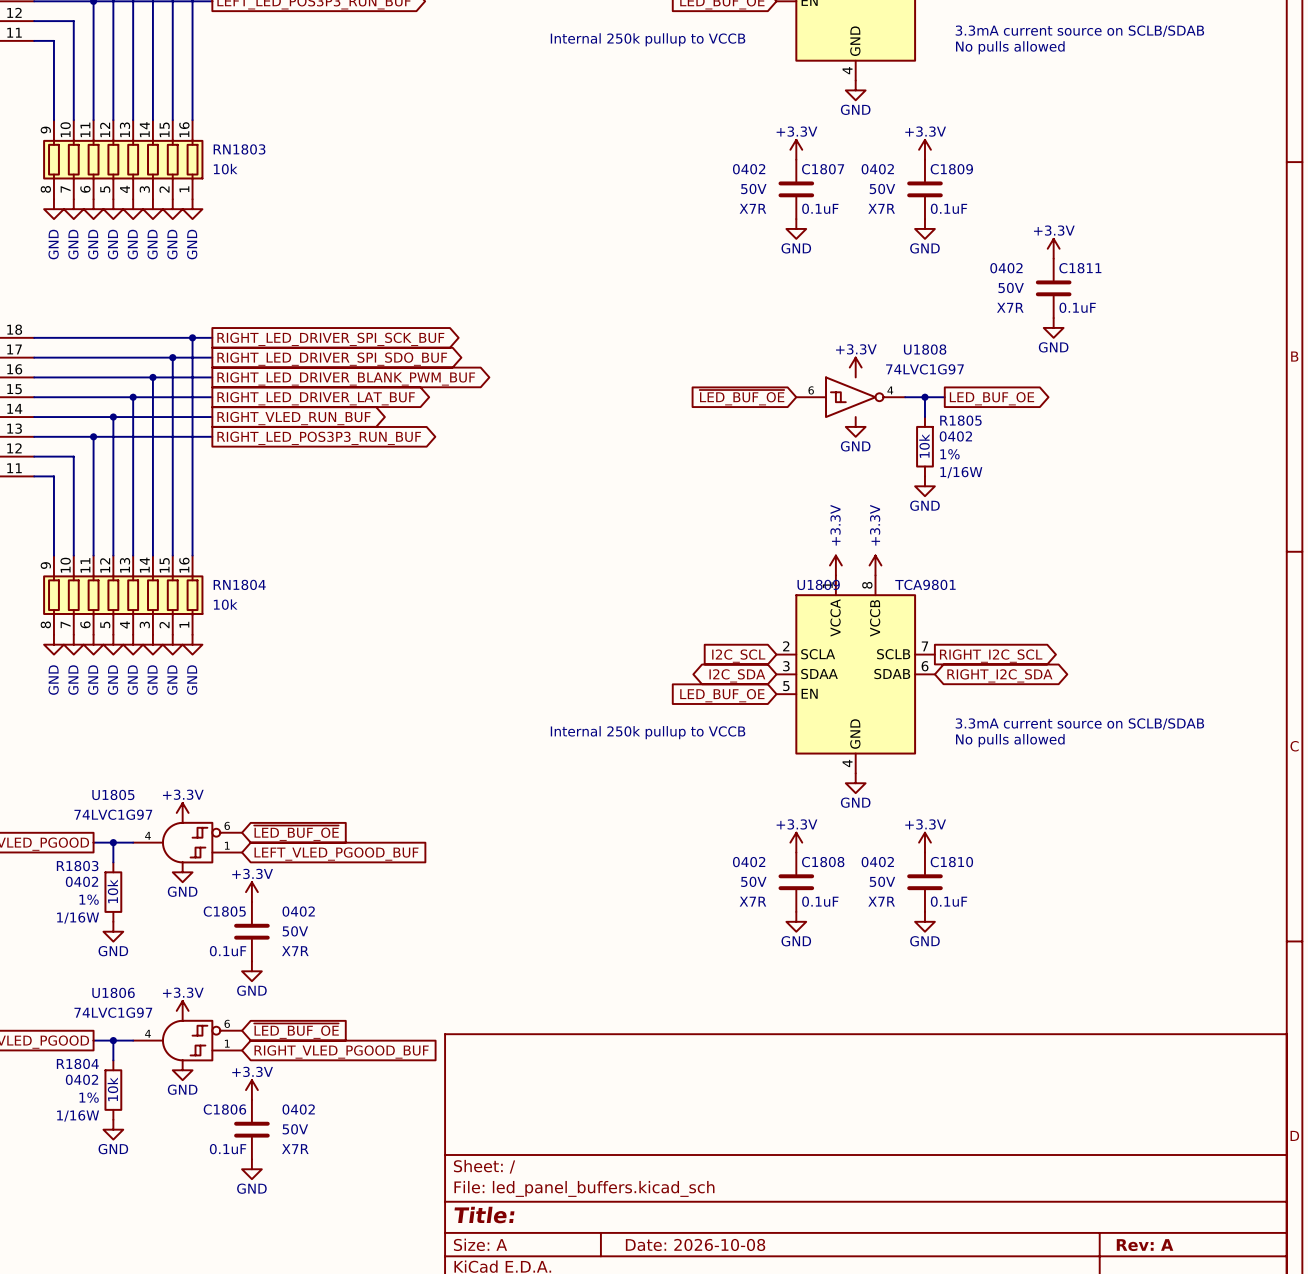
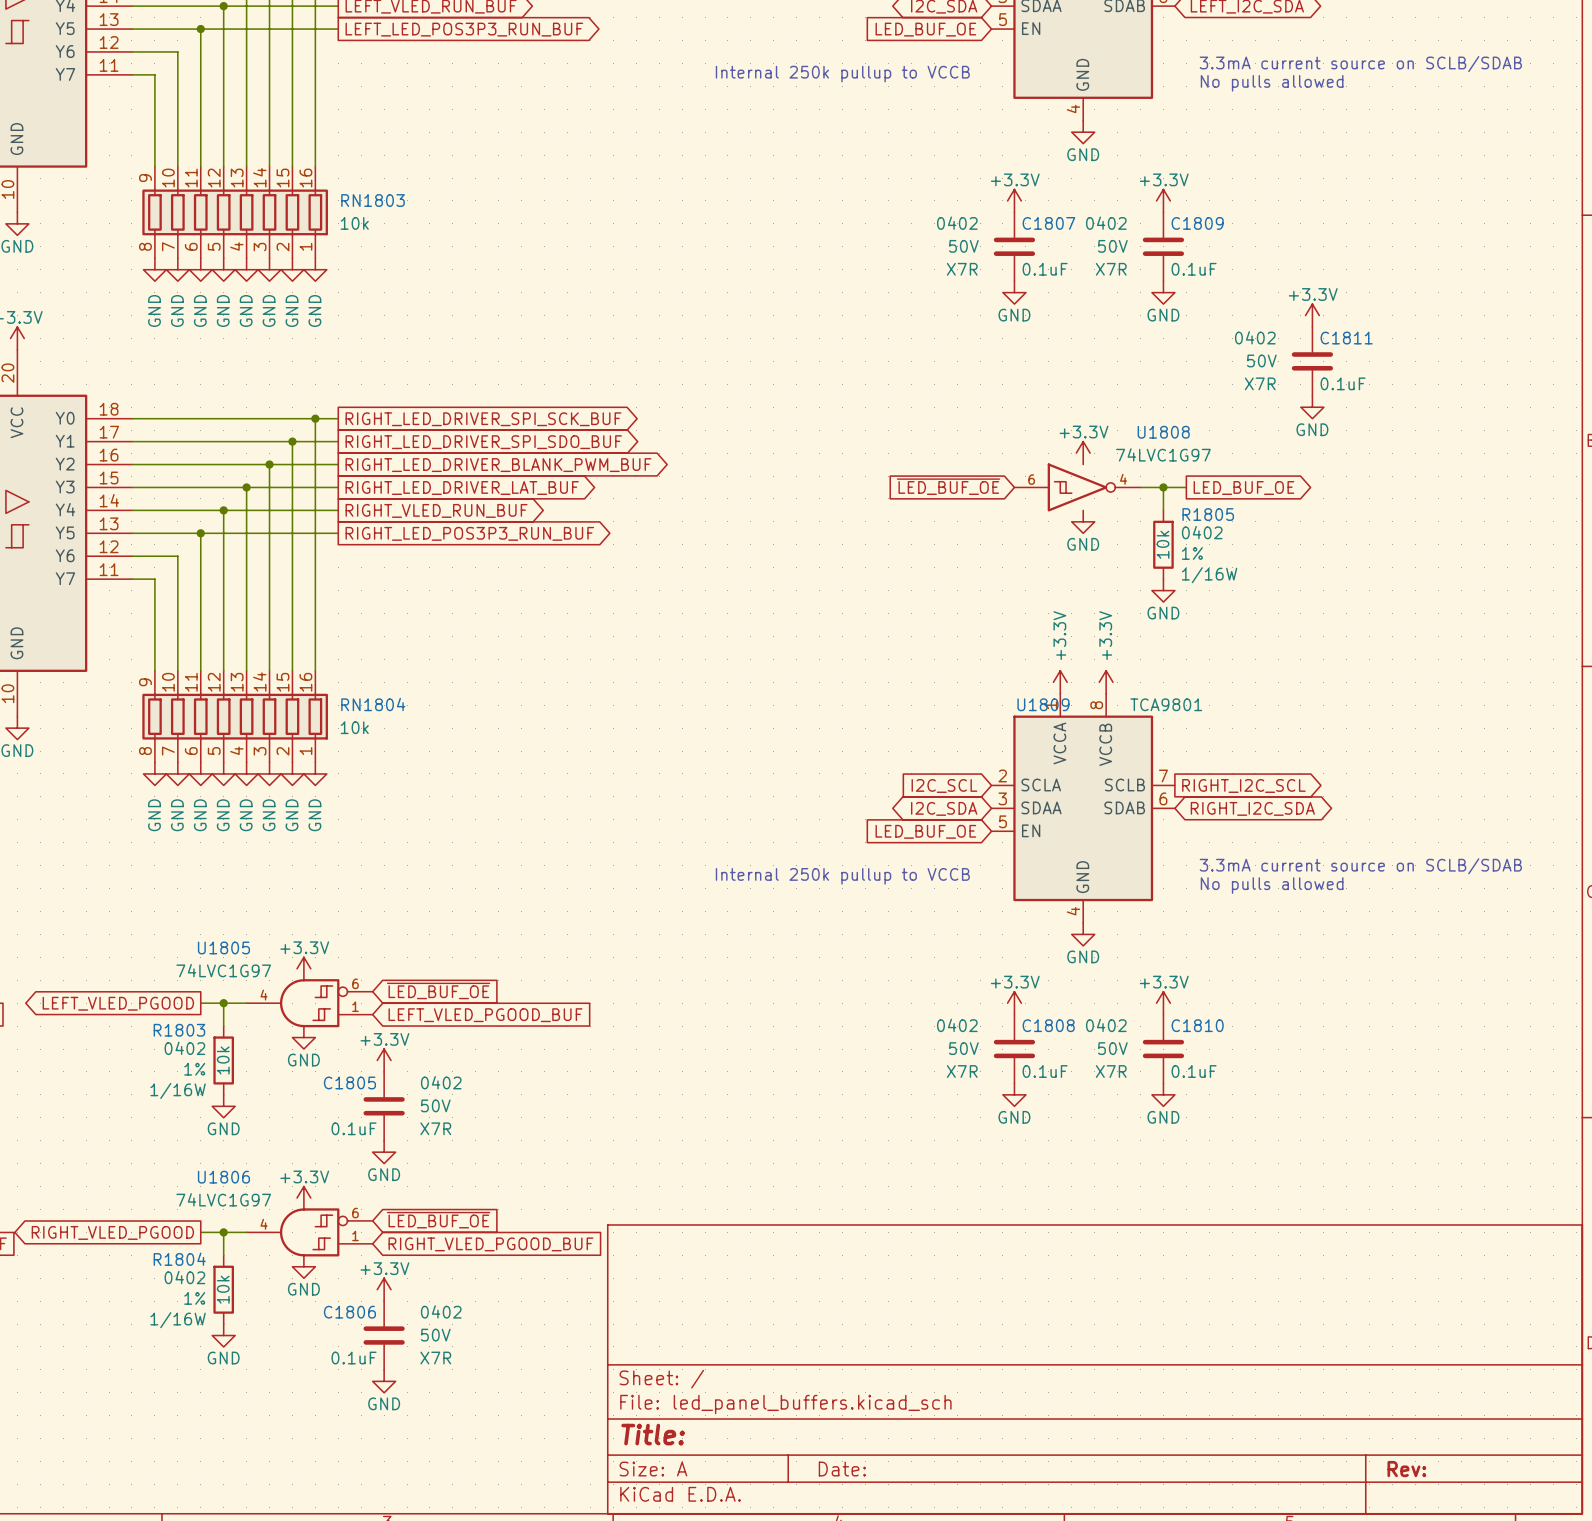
title block: Date: 2026-10-08 (695, 1244) -> Date: (842, 1469)
title block: Rev: A (1145, 1245) -> Rev: (1406, 1469)

